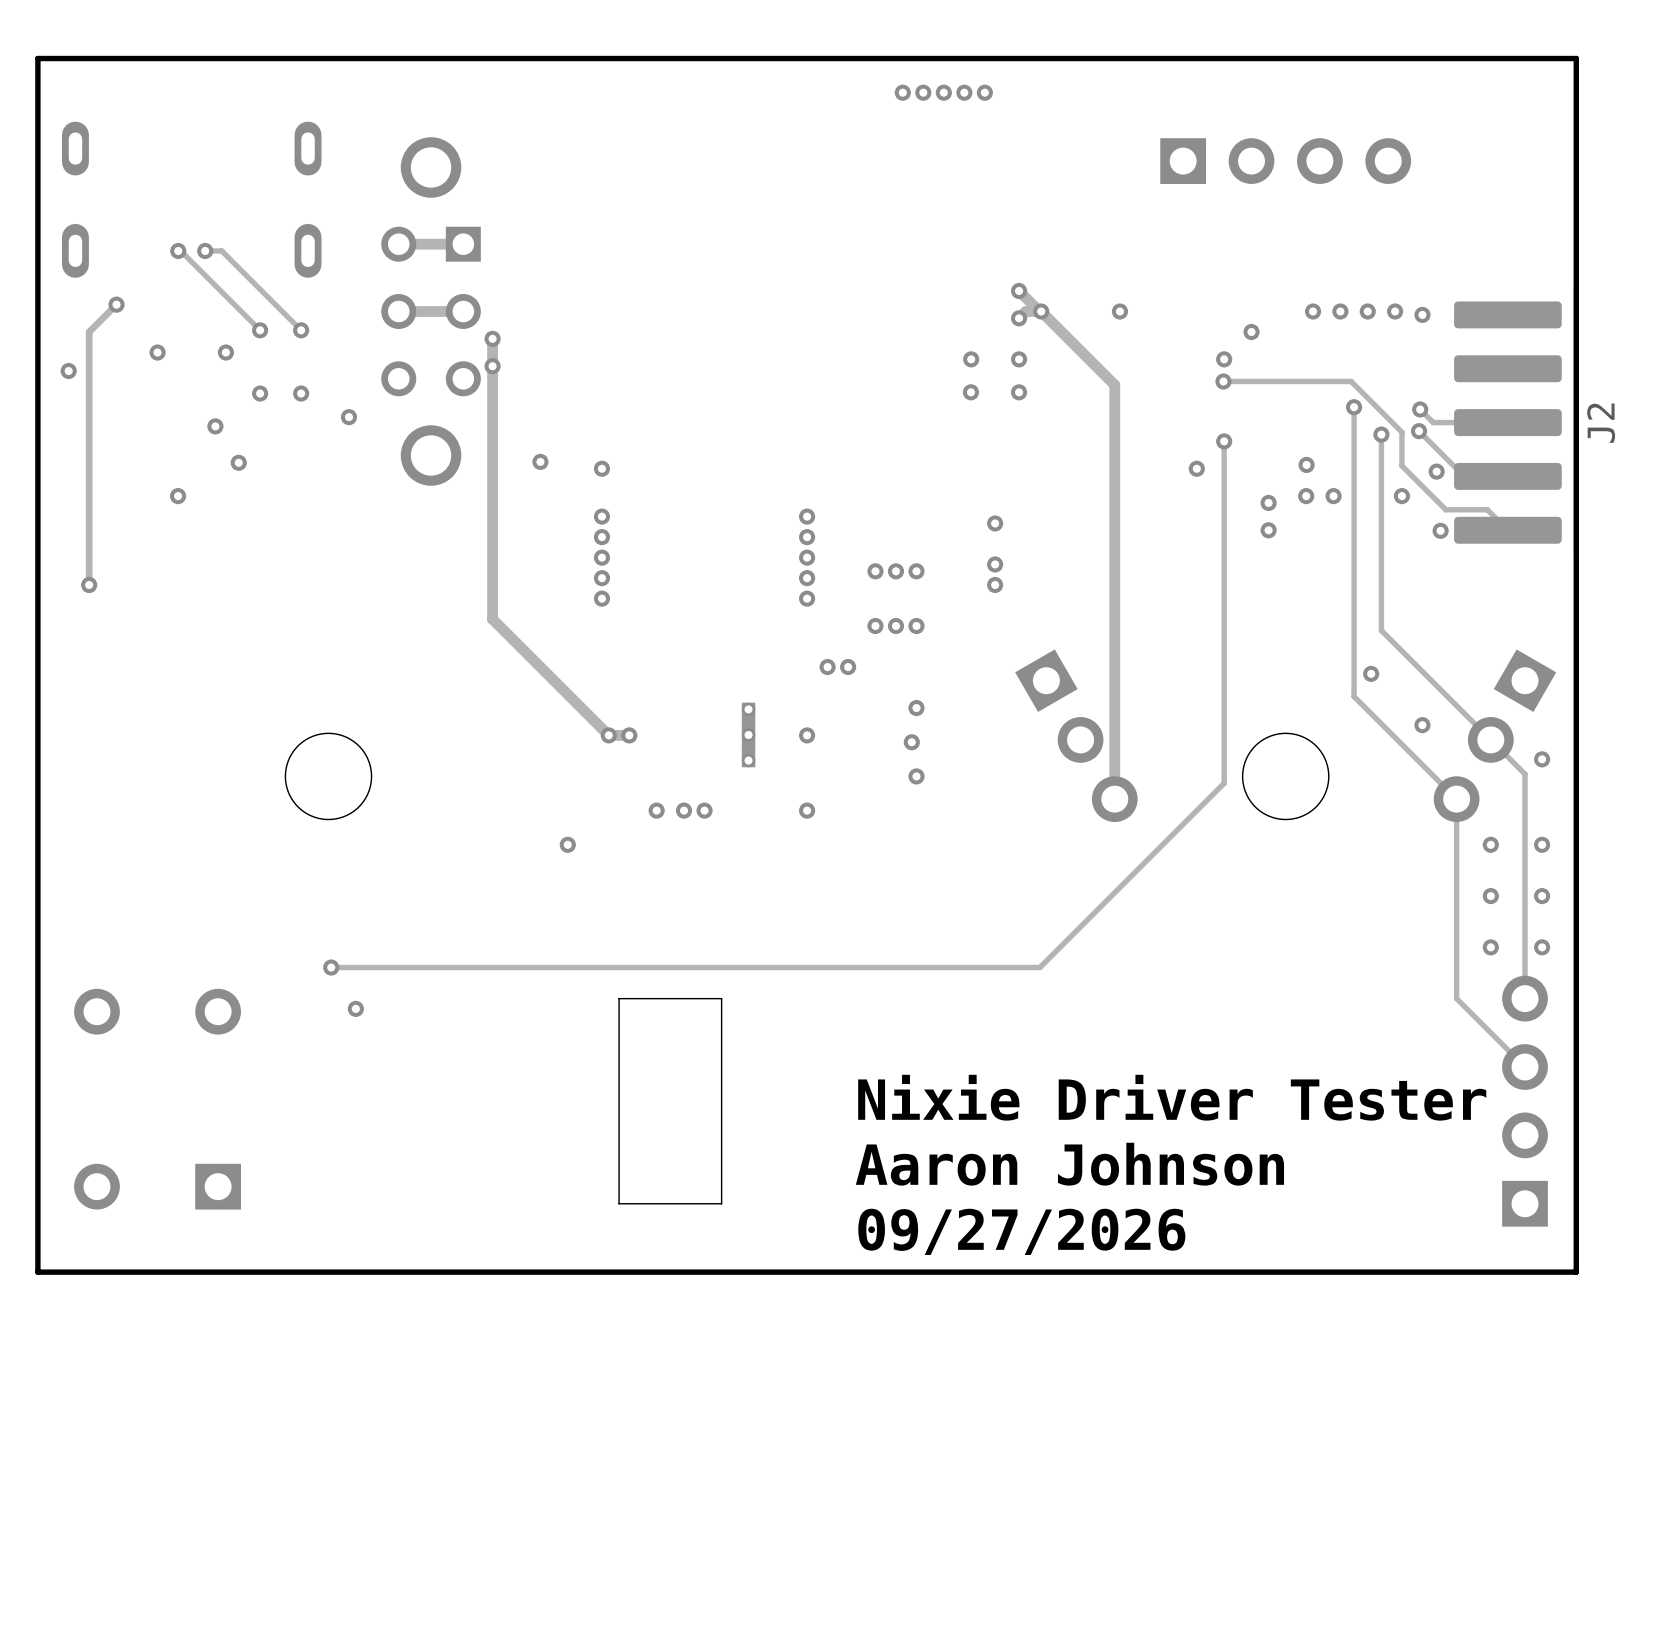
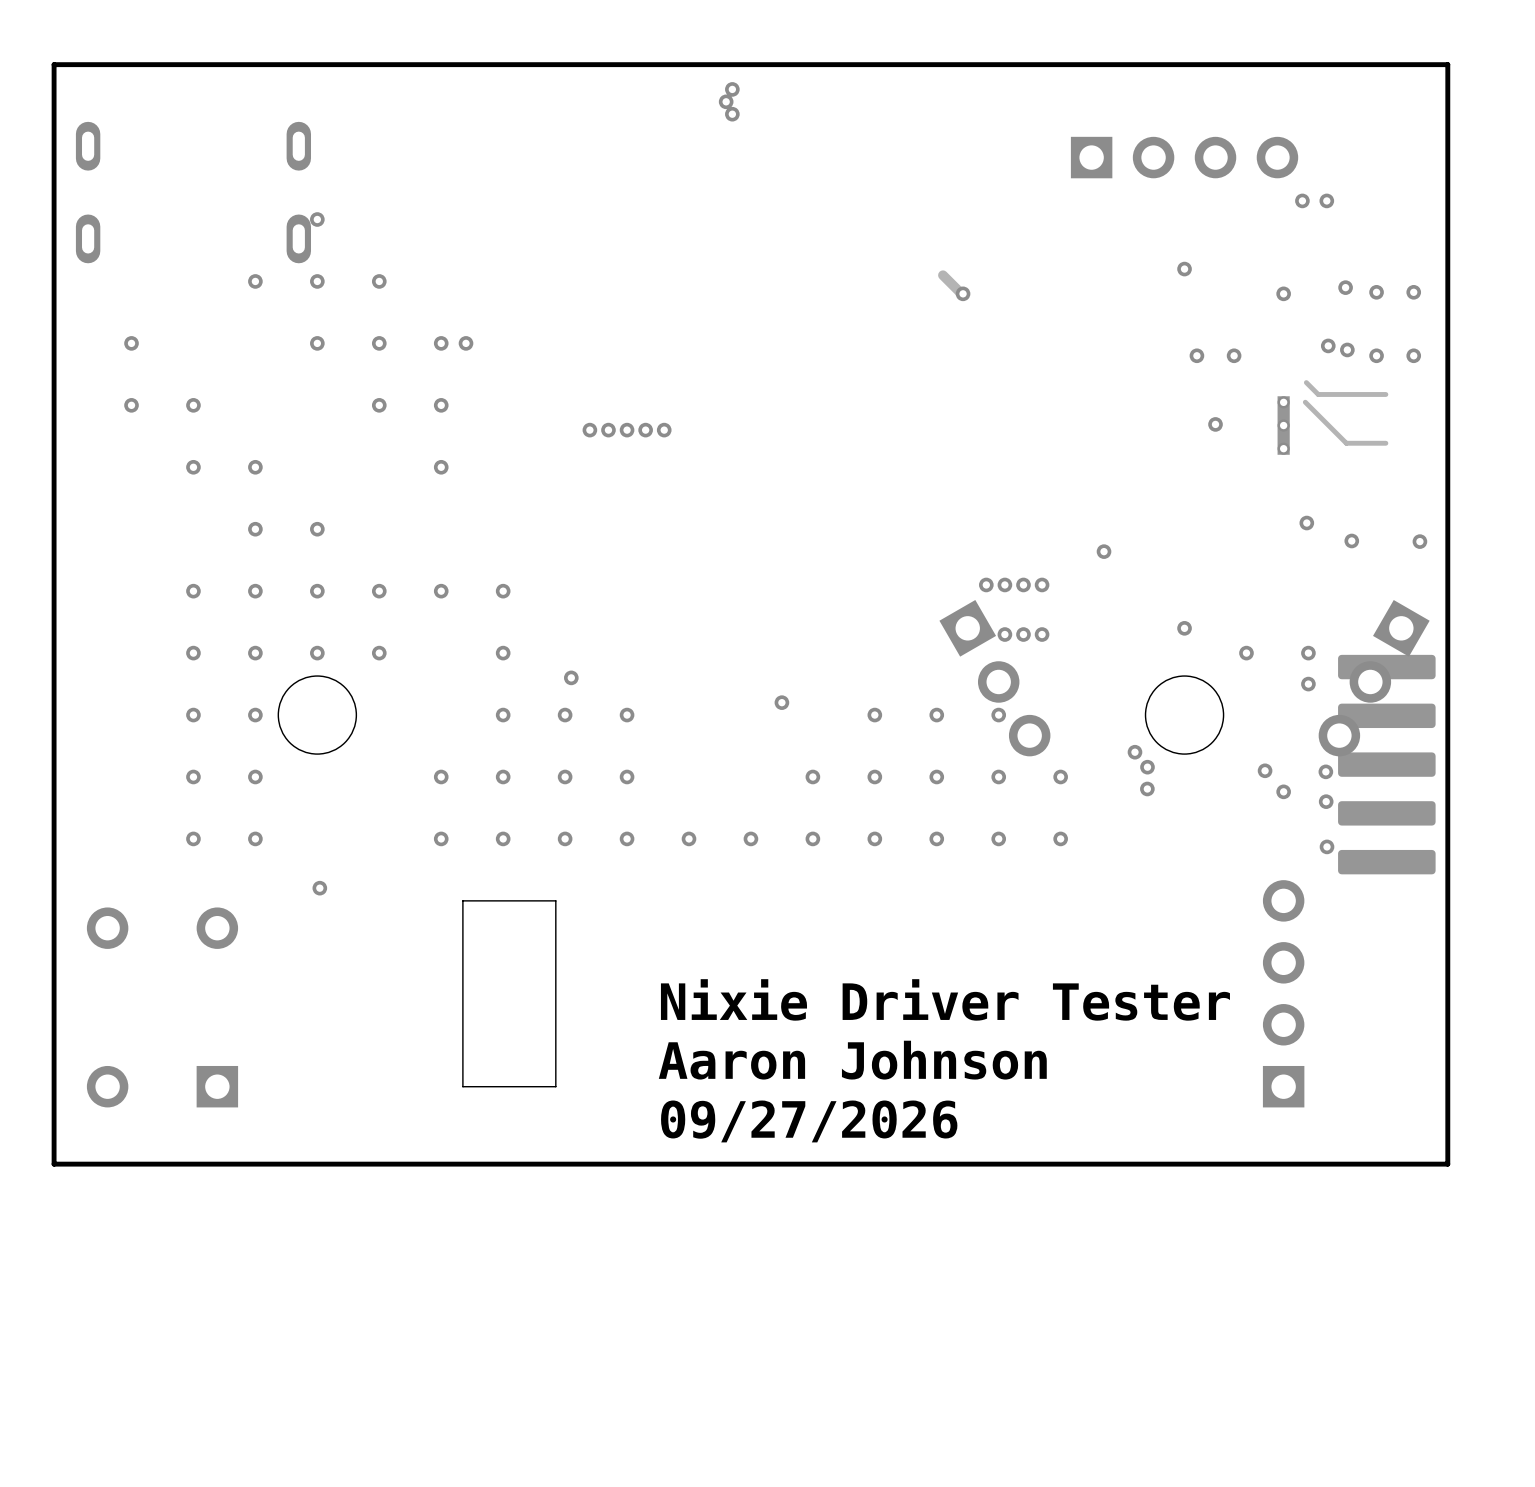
via: none -> (732, 89)
via: (902, 92) -> none
via: (923, 92) -> none
via: (943, 92) -> none
via: (964, 92) -> none
via: (984, 92) -> none
via: none -> (726, 101)
via: none -> (732, 114)
via: none -> (1302, 200)
via: none -> (1326, 200)
via: none -> (317, 219)
track: (463, 244) (398, 244) -> none
track: (178, 250) (180, 250) (260, 330) -> none
via: (178, 250) -> none
track: (205, 250) (221, 250) (301, 330) -> none
via: (205, 250) -> none
via: none -> (1184, 269)
via: (1019, 290) -> none
via: none -> (255, 281)
via: none -> (317, 281)
via: none -> (379, 281)
track: (116, 304) (89, 332) (89, 584) -> none
via: (116, 304) -> none
via: none -> (1345, 287)
via: none -> (1376, 292)
via: none -> (1413, 292)
part: (431, 311) -> none
track: (463, 311) (398, 311) -> none
via: (1119, 311) -> none
via: (1313, 311) -> none
via: (1340, 311) -> none
via: (1367, 311) -> none
via: (1422, 314) -> none
track: (1019, 318) (1025, 311) (1041, 311) (1114, 385) (1114, 799) -> none
via: (1019, 318) -> none
via: (260, 330) -> none
via: (301, 330) -> none
via: (1251, 332) -> none
track: (492, 338) (492, 619) (608, 735) (629, 735) -> none
via position: (492, 338) -> (441, 343)
via: (157, 352) -> none
via: (225, 352) -> none
via: (971, 359) -> none
via: (1019, 359) -> none
via: (1224, 359) -> none
via: none -> (131, 343)
via: none -> (317, 343)
via: none -> (379, 343)
via: none -> (1328, 345)
via: (68, 371) -> none
via: none -> (1347, 349)
via: none -> (1196, 355)
via: none -> (1234, 355)
via: none -> (1376, 355)
via: none -> (1413, 355)
track: (1223, 381) (1351, 381) (1401, 432) (1401, 465) (1445, 509) (1487, 509) (1507, 530) -> none
via: (1223, 381) -> none
via: (970, 392) -> none
via: (1019, 392) -> none
via: (260, 393) -> none
via: (301, 393) -> none
track: (1354, 407) (1354, 696) (1456, 799) (1456, 998) (1525, 1067) -> none
via: (1354, 407) -> none
via: (1420, 409) -> none
via: (349, 417) -> none
J2: (1528, 422) -> none
via position: (215, 426) -> (193, 405)
via: (1419, 431) -> none
via: none -> (131, 405)
via: none -> (379, 405)
via: none -> (441, 405)
track: (1381, 434) (1381, 630) (1525, 774) (1525, 998) -> none
via: (1381, 434) -> none
track: (1224, 441) (1224, 783) (1039, 967) (331, 967) -> none
via: (1224, 441) -> none
part: none -> (1283, 425)
via: (540, 461) -> none
via: none -> (589, 430)
via: none -> (608, 430)
via: none -> (627, 430)
via: none -> (645, 430)
via: none -> (664, 430)
via: (238, 462) -> none
via position: (1306, 464) -> (1215, 424)
via: (601, 468) -> none
via: (1196, 468) -> none
via: (1436, 471) -> none
via position: (178, 496) -> (193, 467)
via: (1306, 496) -> none
via: (1333, 496) -> none
via: (1401, 496) -> none
via: none -> (255, 467)
via: none -> (441, 467)
via: (1268, 502) -> none
via: (601, 516) -> none
via: (807, 516) -> none
via: (995, 523) -> none
via: (1268, 530) -> none
via: (1440, 530) -> none
via: (601, 537) -> none
via: (807, 537) -> none
via: (601, 557) -> none
via: (807, 557) -> none
via: (995, 564) -> none
via: none -> (1306, 523)
via: none -> (255, 529)
via: none -> (317, 529)
via: (875, 571) -> none
via: (895, 571) -> none
via: (916, 571) -> none
via: (601, 578) -> none
via: (807, 578) -> none
via: (89, 584) -> none
via: (995, 584) -> none
via: none -> (1351, 540)
via: none -> (1419, 541)
via: none -> (1104, 551)
via: (601, 598) -> none
via: (807, 598) -> none
via: (875, 626) -> none
via: (895, 626) -> none
via: (916, 626) -> none
via: none -> (986, 584)
via: none -> (1004, 584)
via: none -> (1023, 584)
via: none -> (1042, 584)
via: none -> (193, 591)
via: none -> (255, 591)
via: none -> (317, 591)
via: none -> (379, 591)
via: none -> (441, 591)
via: none -> (503, 591)
via: (827, 667) -> none
via: (848, 667) -> none
via: (1371, 673) -> none
via: none -> (1184, 628)
via: none -> (1004, 634)
via: none -> (1023, 634)
via: none -> (1042, 634)
via: none -> (193, 653)
via: none -> (255, 653)
via: none -> (317, 653)
via: none -> (379, 653)
via: none -> (503, 653)
via: (916, 708) -> none
via: none -> (1246, 653)
via: none -> (1308, 653)
via: (1422, 725) -> none
part: (748, 734) -> none
via: (629, 735) -> none
via: (807, 735) -> none
via: (911, 742) -> none
via: none -> (1308, 684)
via: (1542, 759) -> none
via: none -> (781, 702)
via: none -> (193, 715)
via: none -> (255, 715)
via: none -> (503, 715)
via: none -> (565, 715)
via: none -> (627, 715)
via: (916, 776) -> none
via: none -> (874, 715)
via: none -> (936, 715)
via: none -> (998, 715)
via: (656, 810) -> none
via: (684, 810) -> none
via: (704, 810) -> none
via: (807, 810) -> none
via: none -> (1134, 752)
part: none -> (1405, 764)
via: none -> (1147, 767)
via: none -> (1265, 770)
via: none -> (1325, 771)
via: none -> (193, 776)
via: none -> (255, 776)
via: none -> (441, 776)
via: none -> (503, 776)
via: (567, 844) -> none
via: none -> (565, 776)
via: none -> (627, 776)
via: none -> (812, 776)
via: none -> (874, 776)
via: none -> (936, 776)
via: none -> (998, 776)
via: none -> (1060, 776)
via: (1490, 844) -> none
via: (1542, 844) -> none
via: none -> (1147, 788)
via: none -> (1283, 791)
via: none -> (1326, 801)
via: (1490, 896) -> none
via: (1542, 896) -> none
via: none -> (193, 838)
via: none -> (255, 838)
via: none -> (441, 838)
via: none -> (503, 838)
via: none -> (565, 838)
via: none -> (627, 838)
via: none -> (689, 838)
via: none -> (750, 838)
via: none -> (812, 838)
via: none -> (874, 838)
via: none -> (936, 838)
via: none -> (998, 838)
via: none -> (1060, 838)
via: none -> (1327, 846)
via: (1490, 947) -> none
via: (1542, 947) -> none
board edge: (721, 998) (619, 998) (619, 1203) (721, 1203) (721, 998) -> (555, 900) (462, 900) (462, 1086) (555, 1086) (555, 900)
via: (355, 1008) -> none
text position: Nixie Driver Tester (1172, 1097) -> Nixie Driver Tester (945, 999)
part position: (1525, 1101) -> (1283, 993)
text position: Aaron Johnson (1069, 1164) -> Aaron Johnson (852, 1060)
text position: 09/27/2026 (1021, 1231) -> 09/27/2026 (809, 1121)

